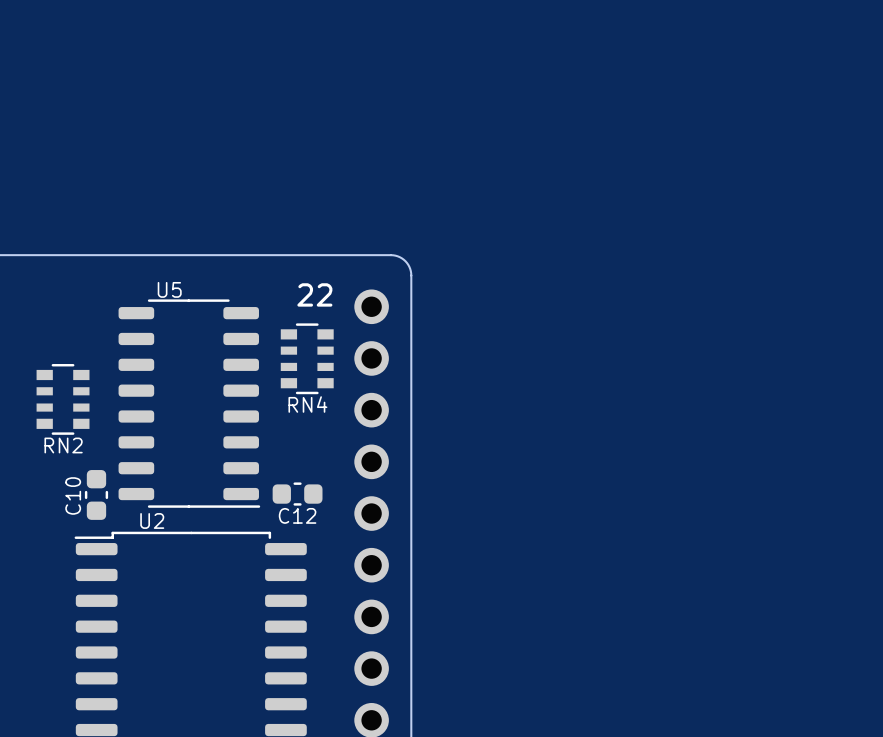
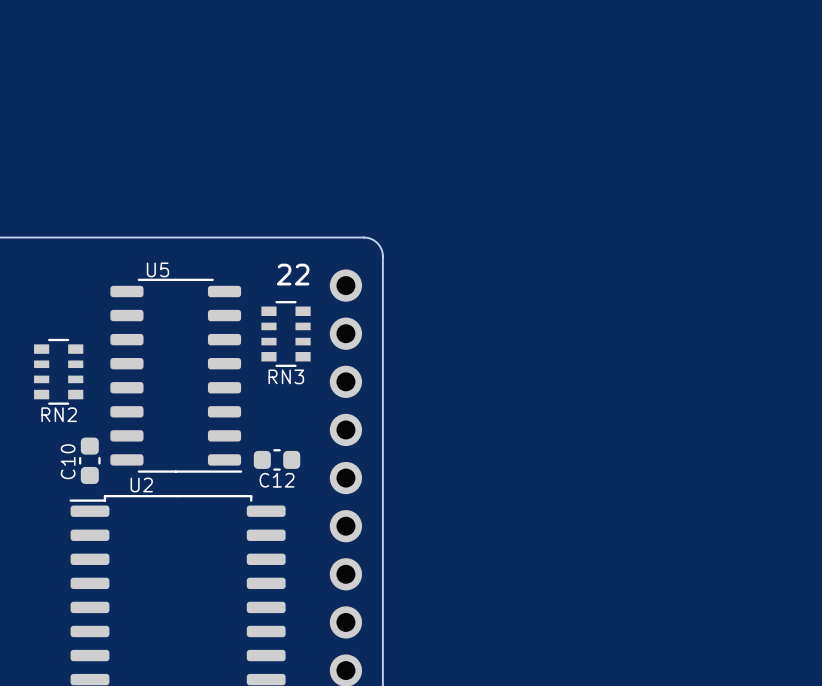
RN4 name: RN4 (307, 404) -> RN3 (286, 376)

